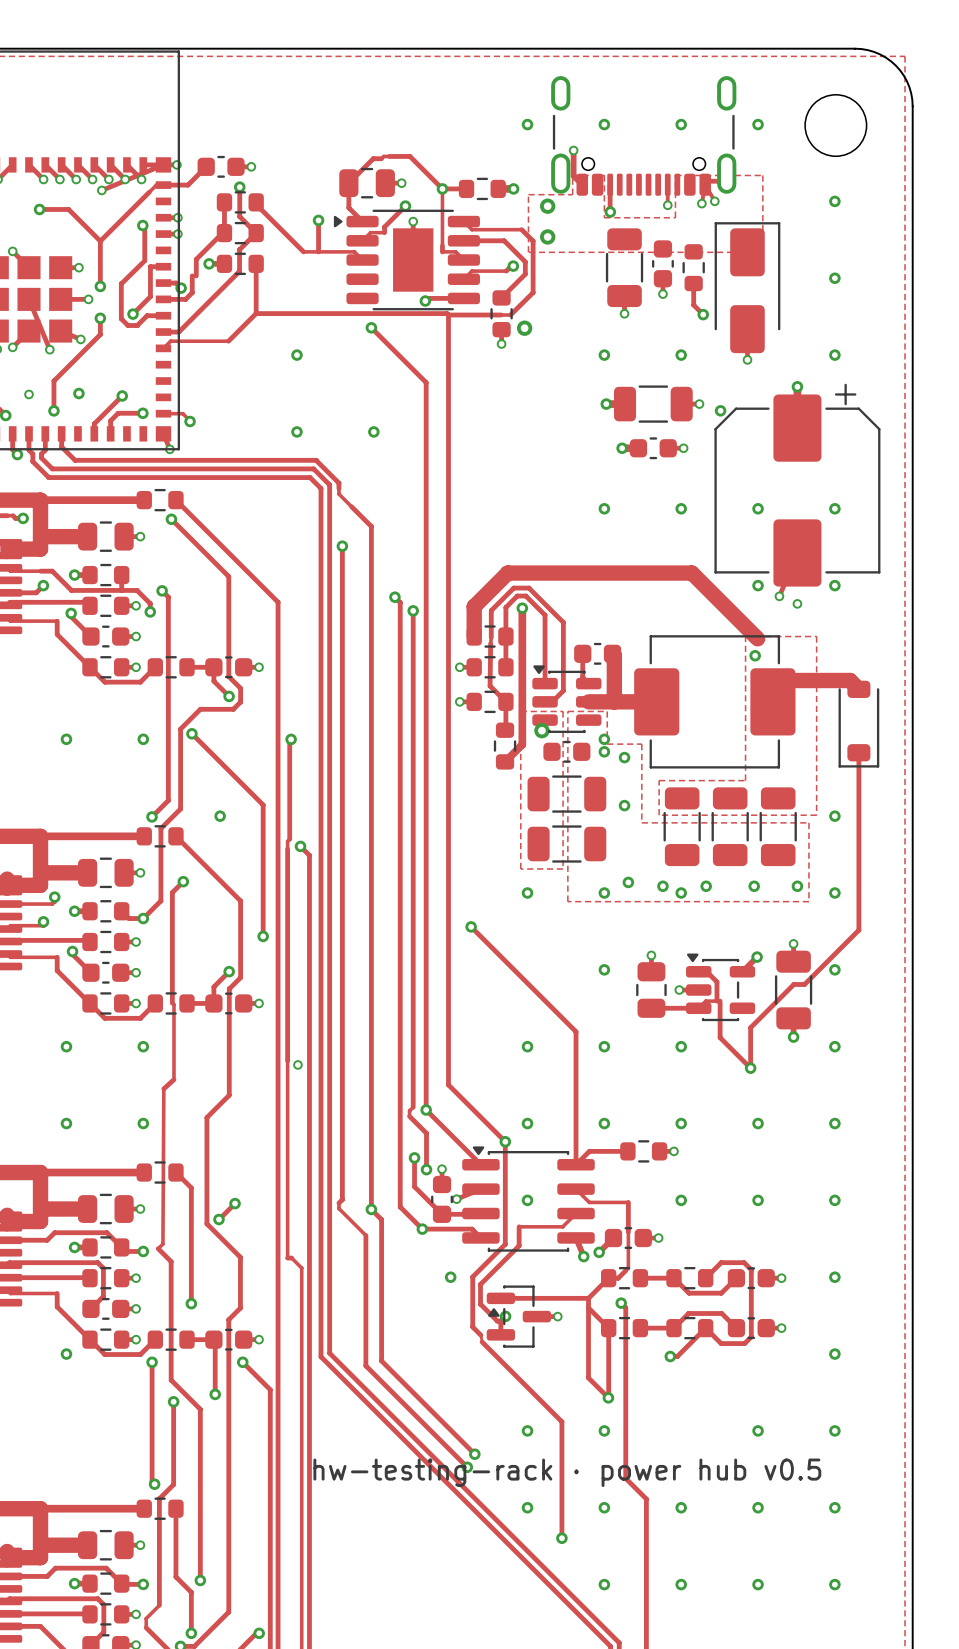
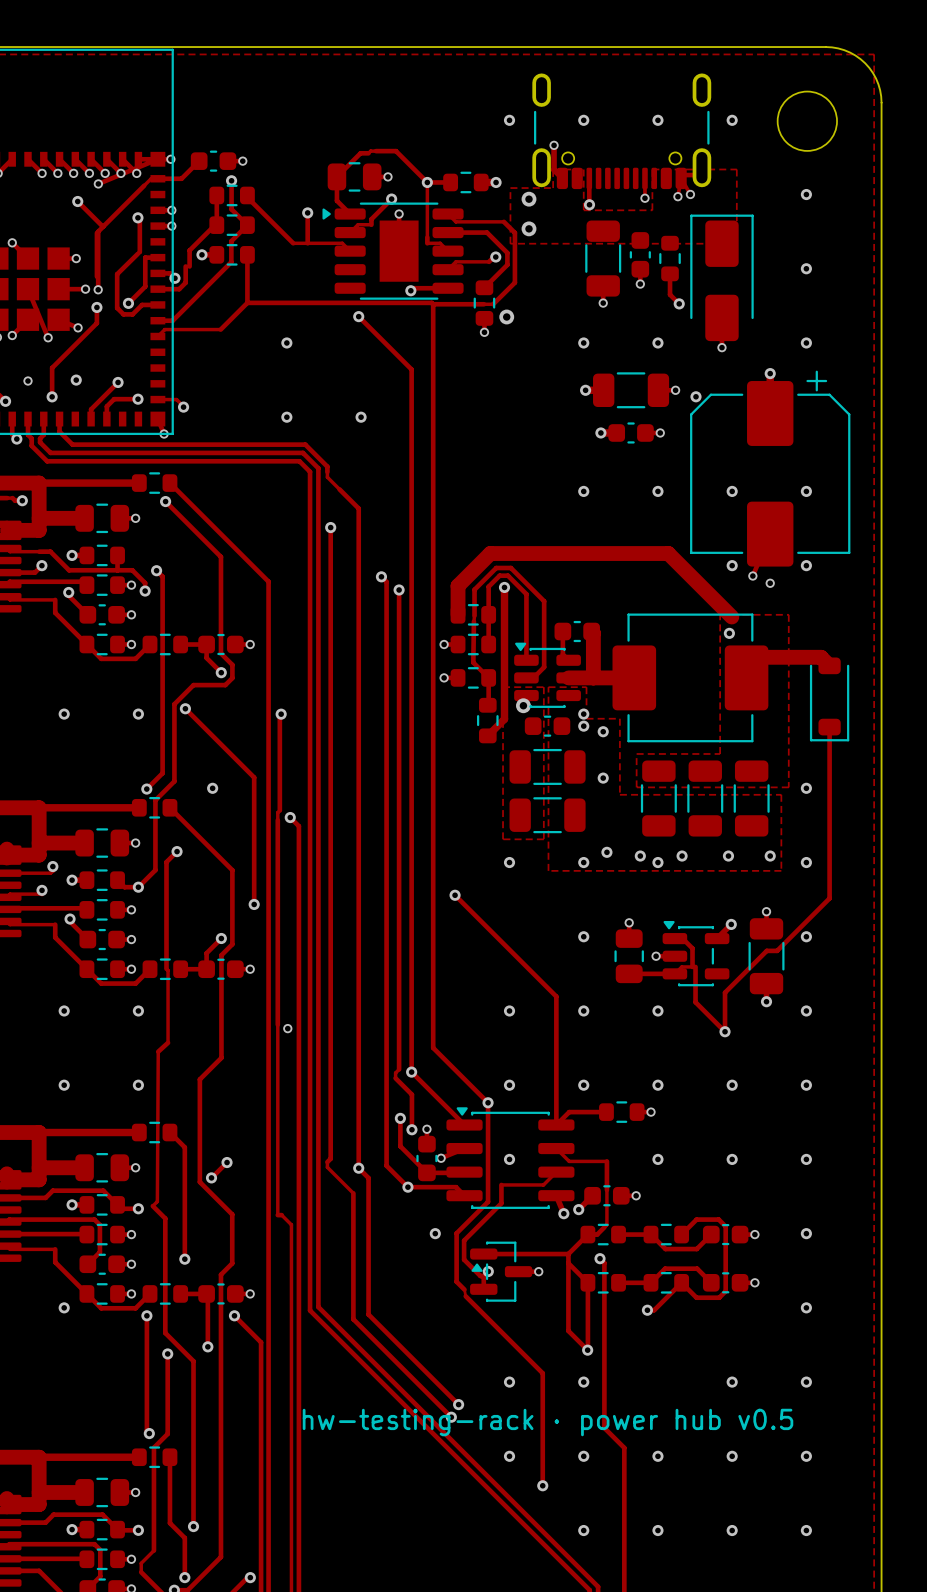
track: none -> (77, 201) (103, 226)
via: none -> (77, 201)
track: (39, 209) (68, 209) (100, 241) (101, 239) -> (98, 289) (98, 231)
via: (39, 209) -> none
via: (100, 286) -> none
via: none -> (98, 289)

